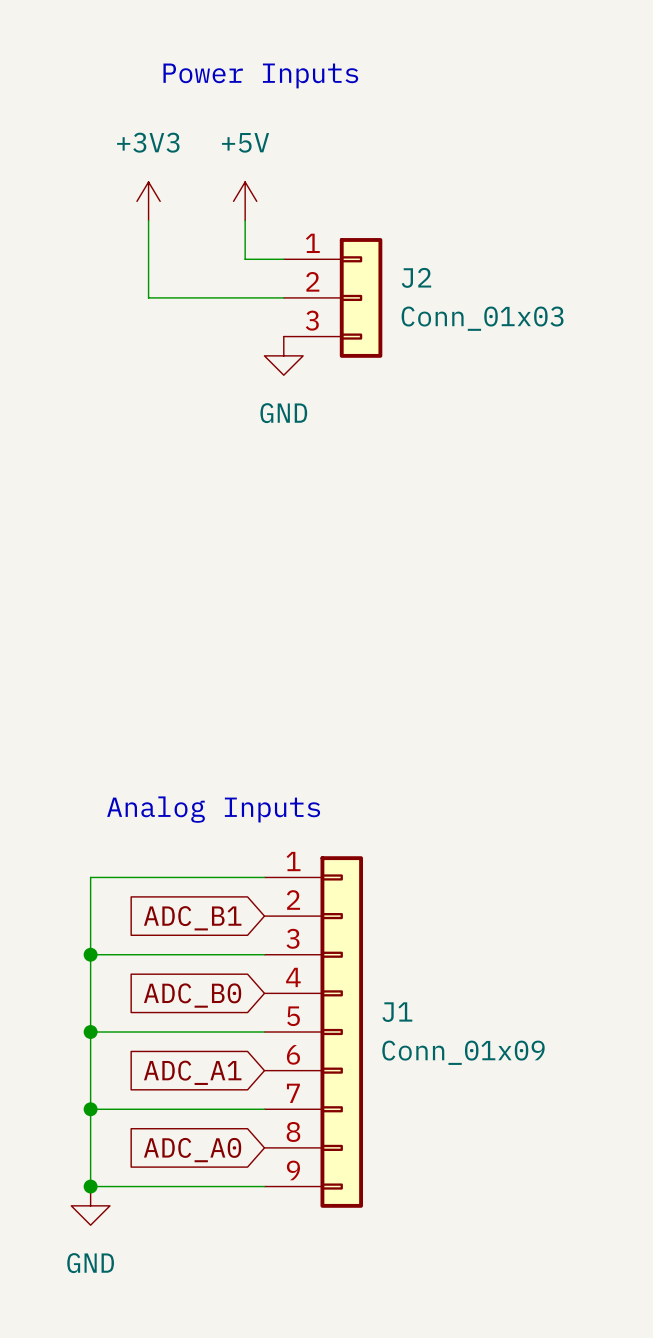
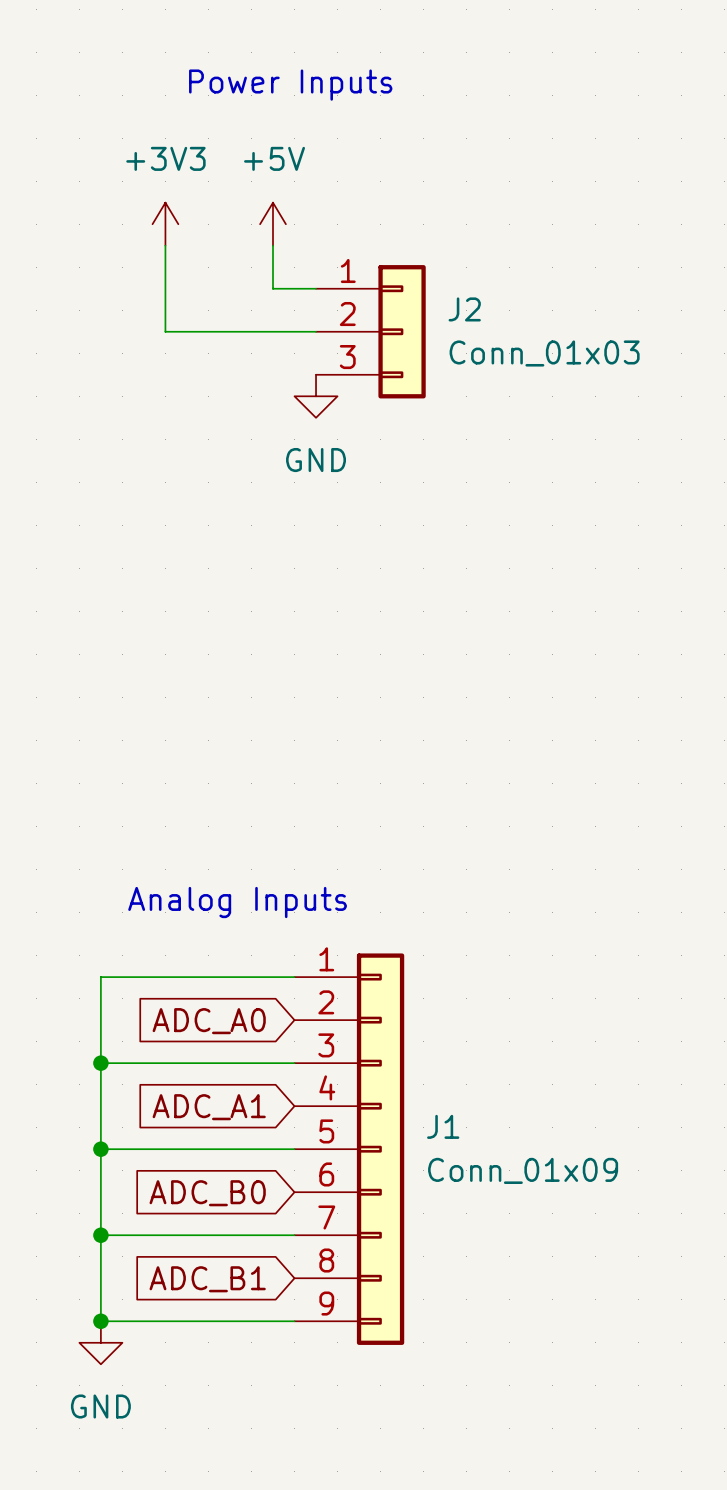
global label: ADC_B1 (192, 918) -> ADC_A0 (209, 1021)
global label: ADC_B0 (192, 995) -> ADC_A1 (209, 1107)
global label: ADC_A1 (192, 1072) -> ADC_B0 (207, 1193)
global label: ADC_A0 (192, 1150) -> ADC_B1 (207, 1279)

